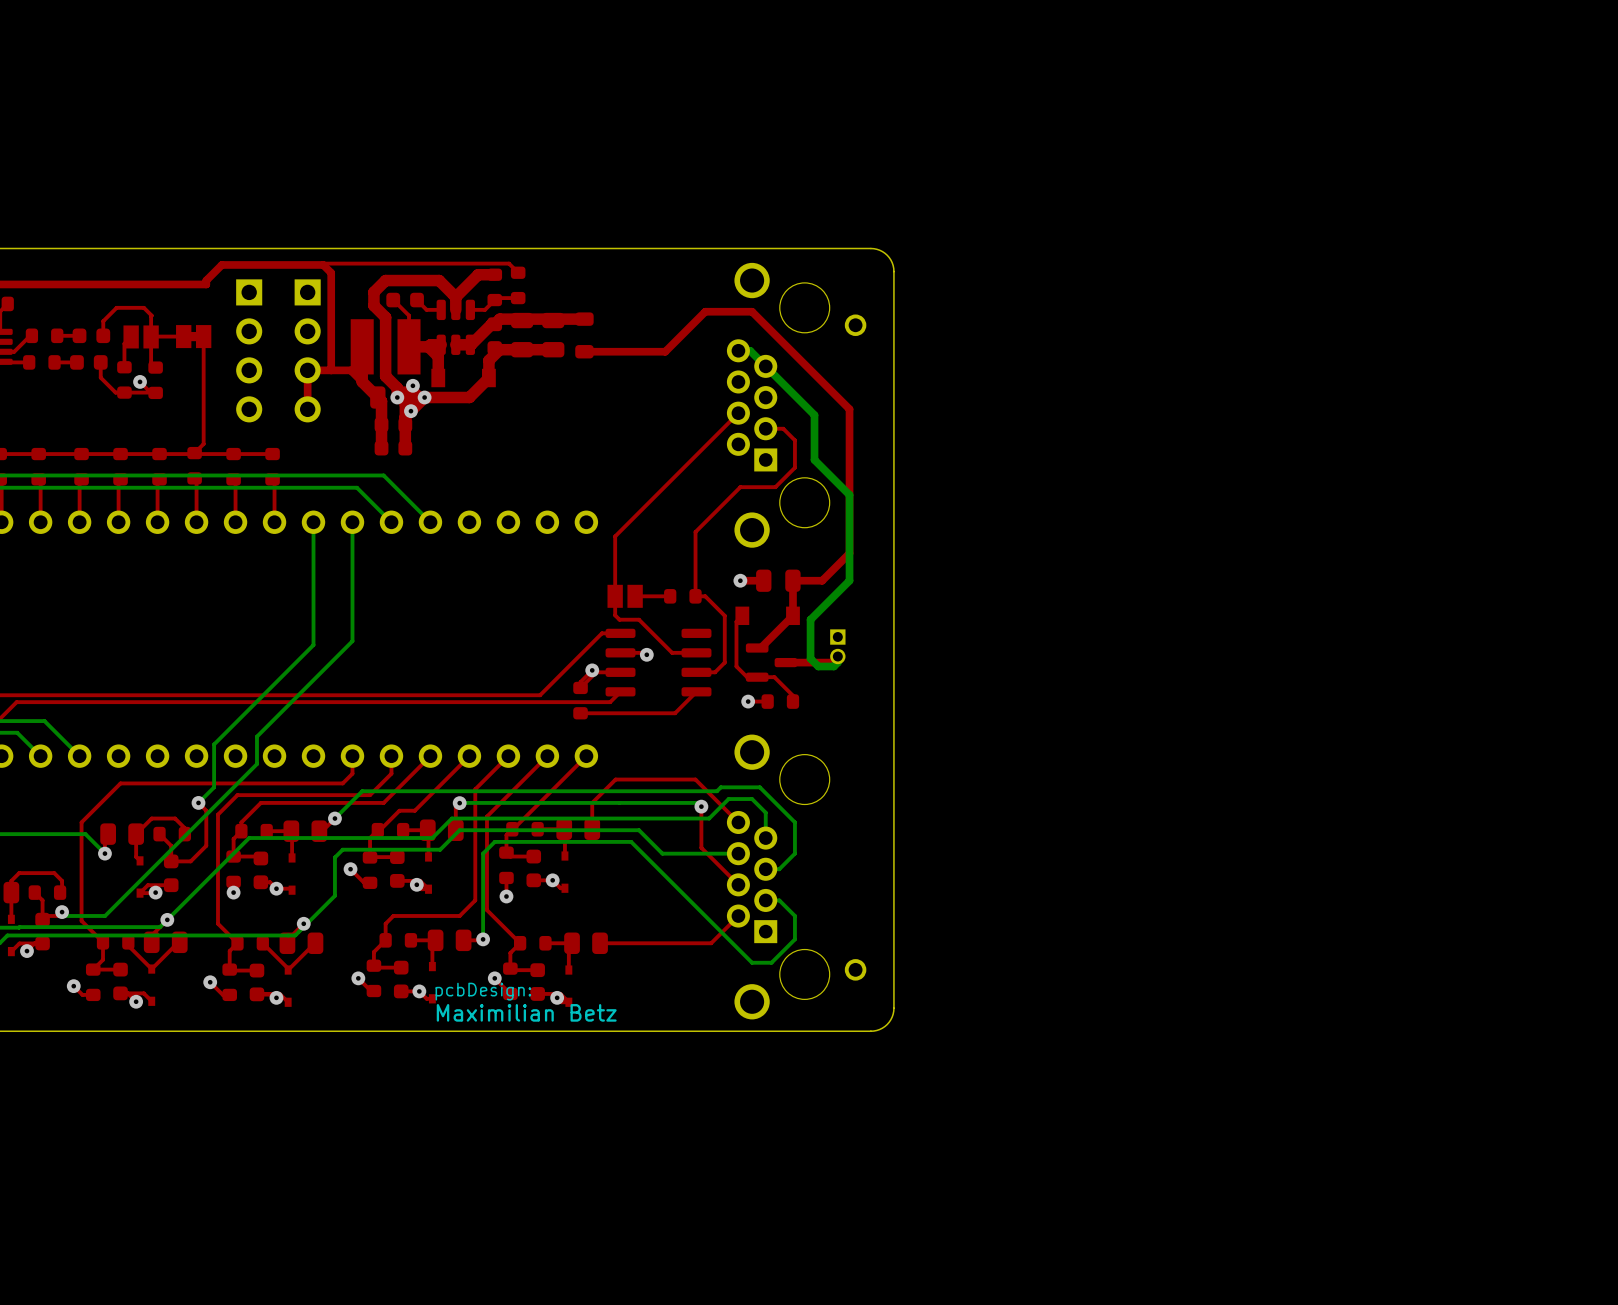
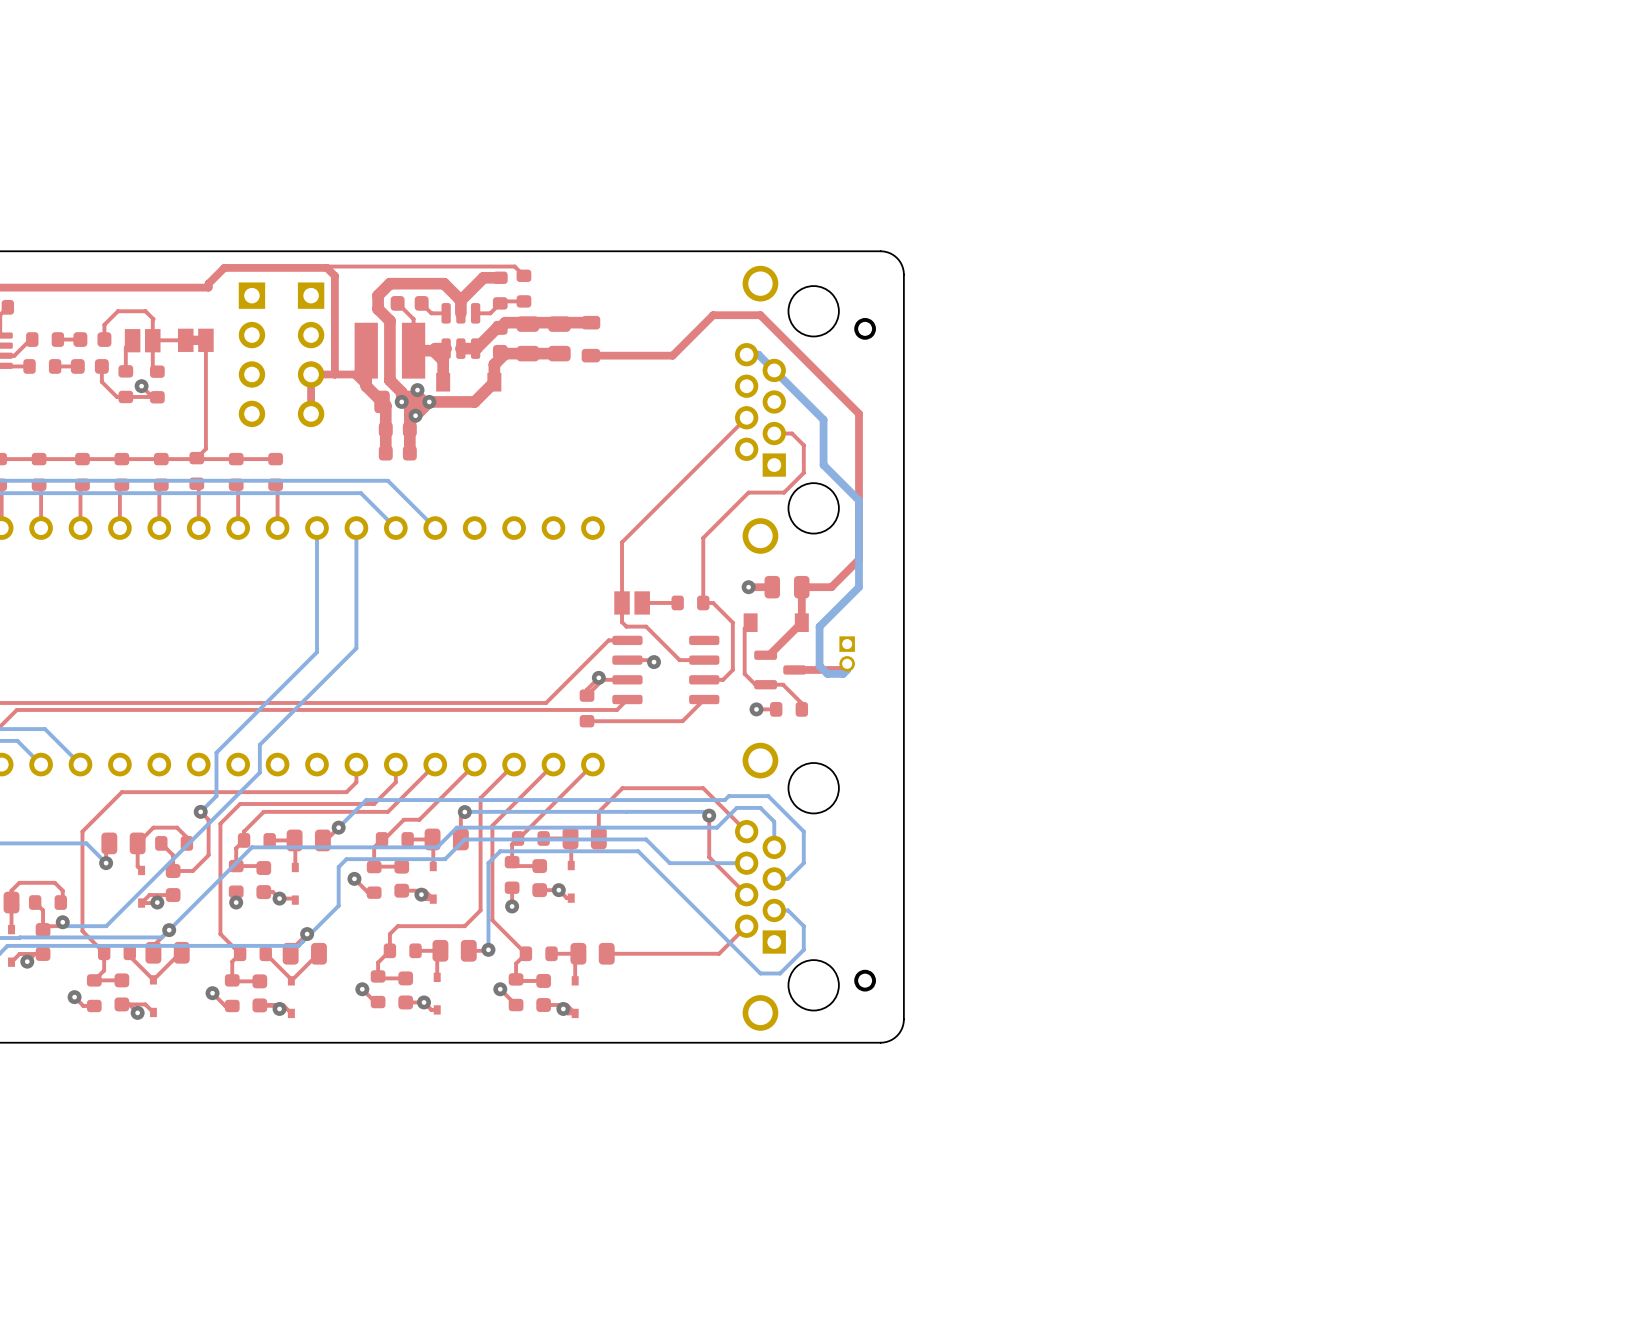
text: pcbDesign: (483, 991) -> none
text: Maximilian Betz (526, 1012) -> none

